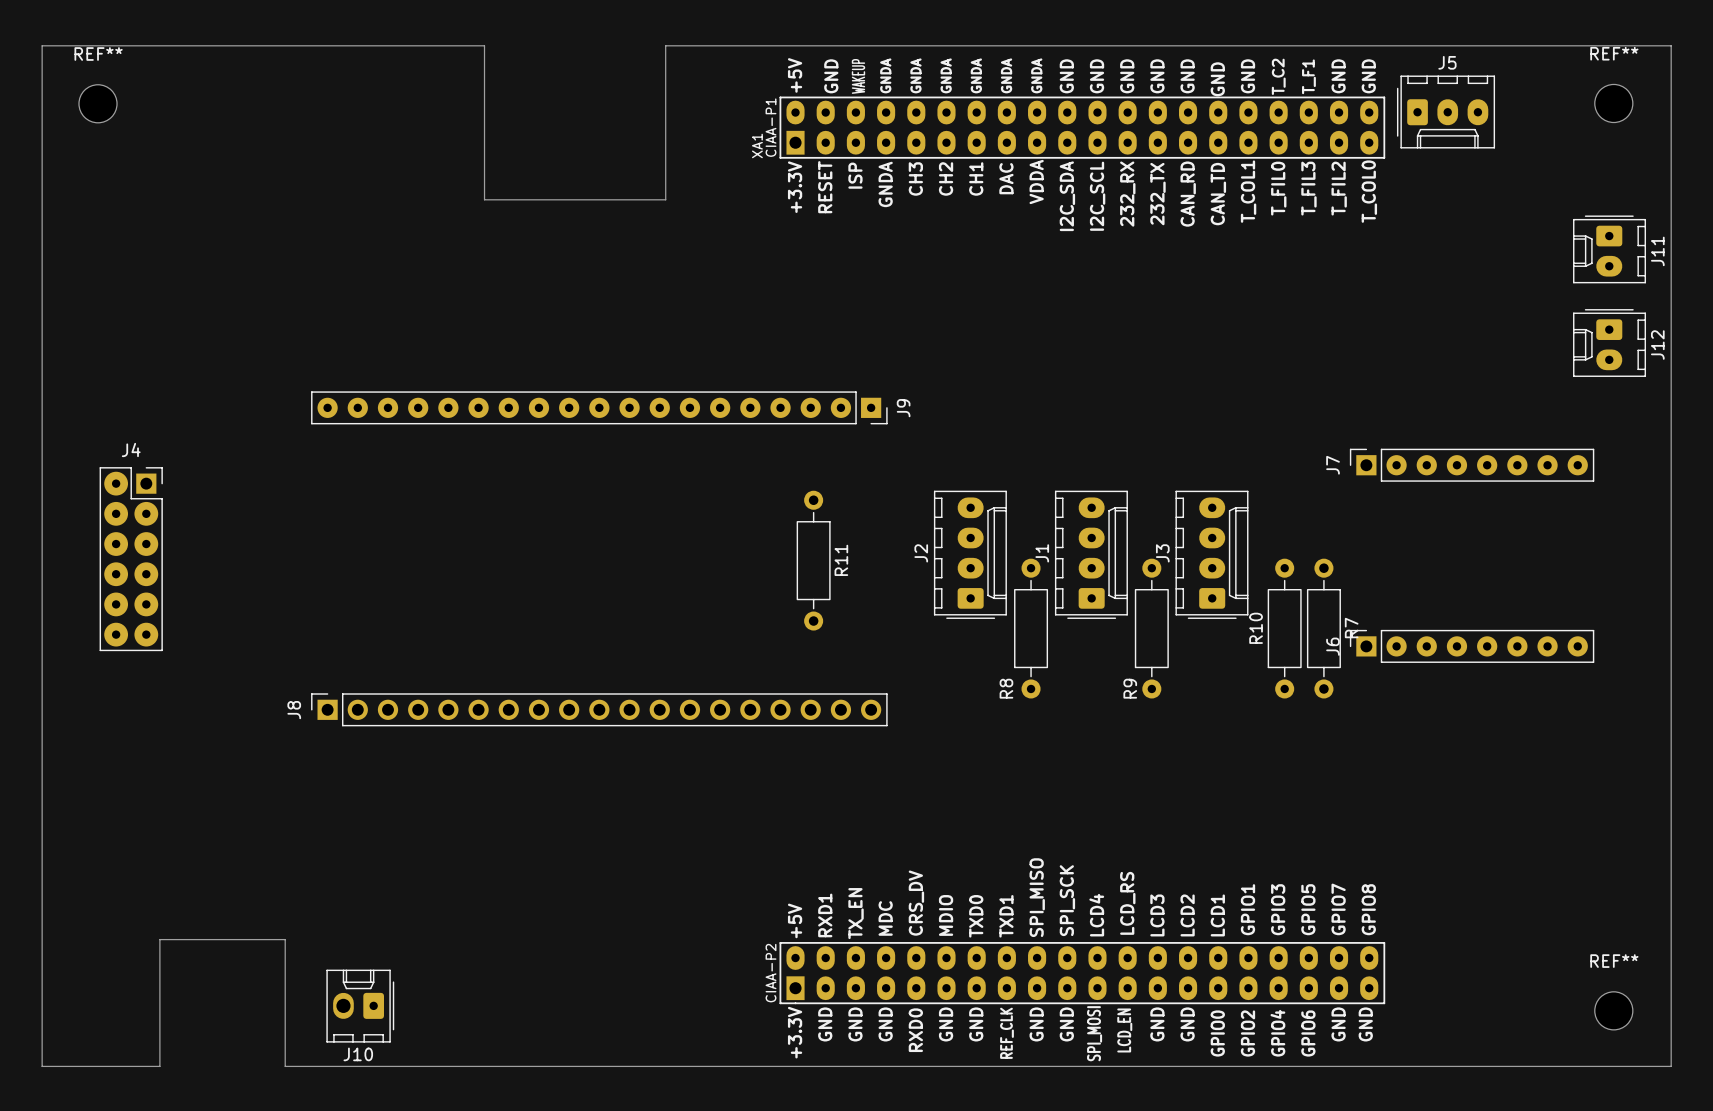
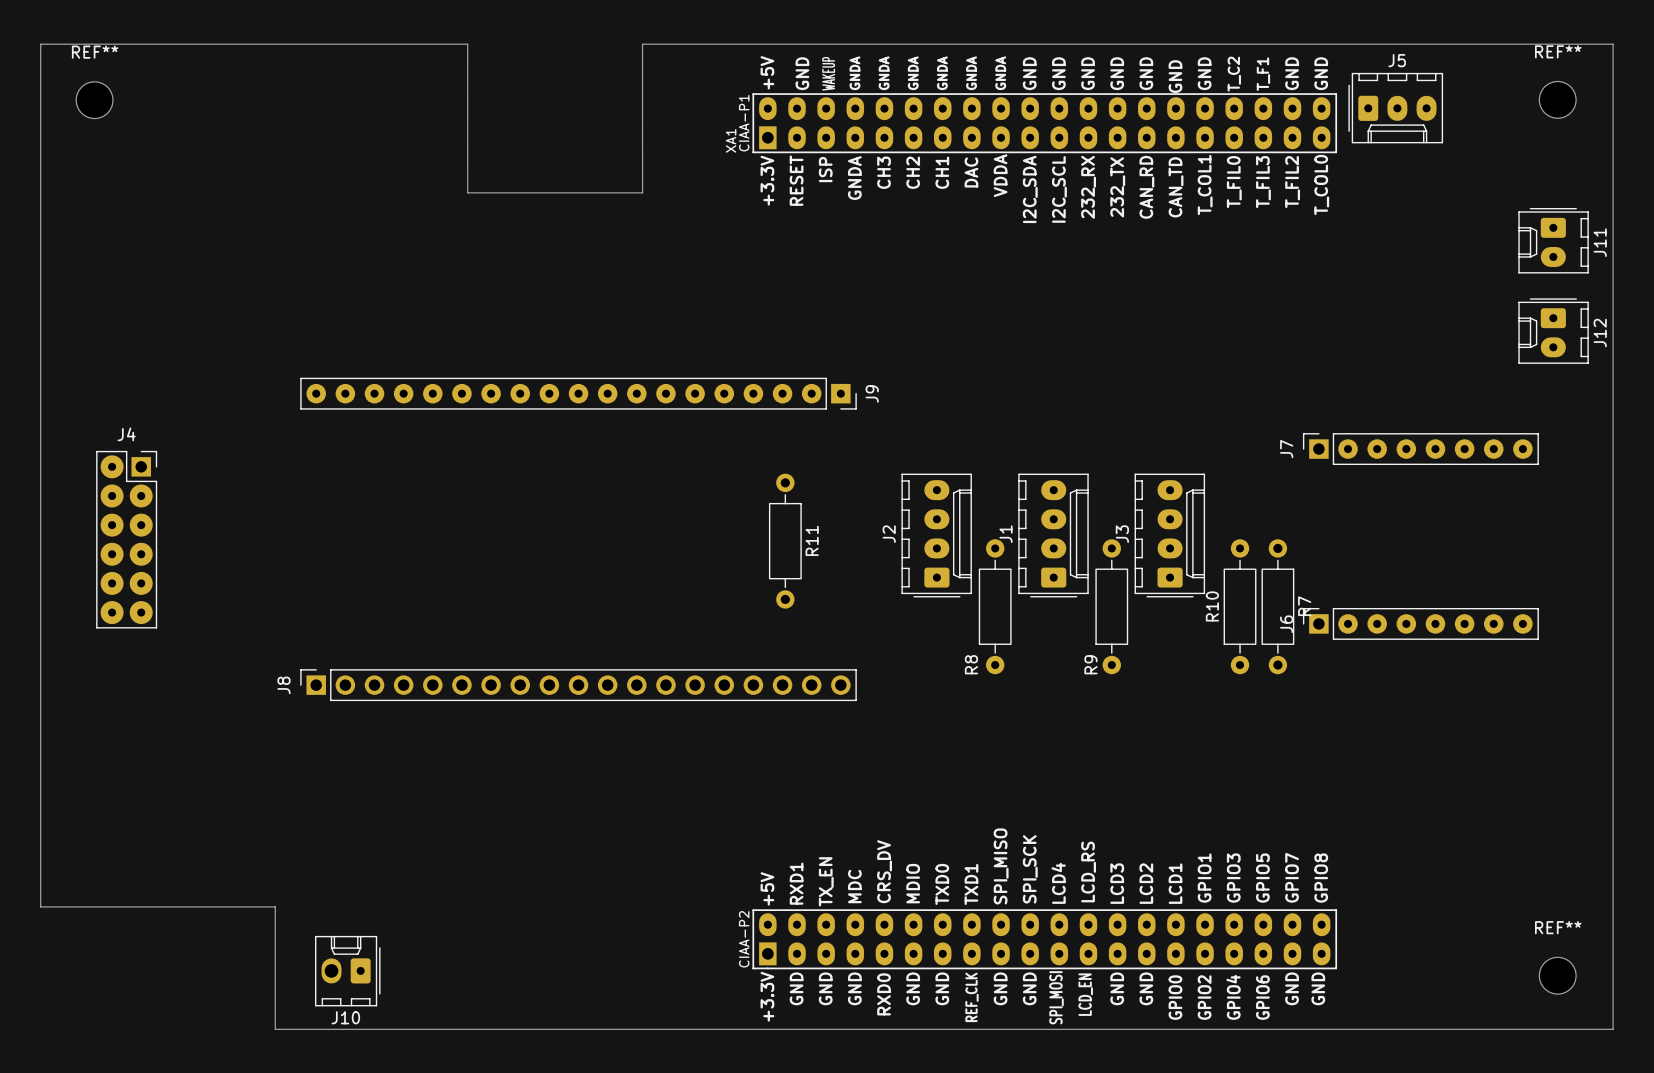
board edge: (42, 939) (42, 1066) (159, 1066) (159, 939) -> (40, 906) (154, 906)

